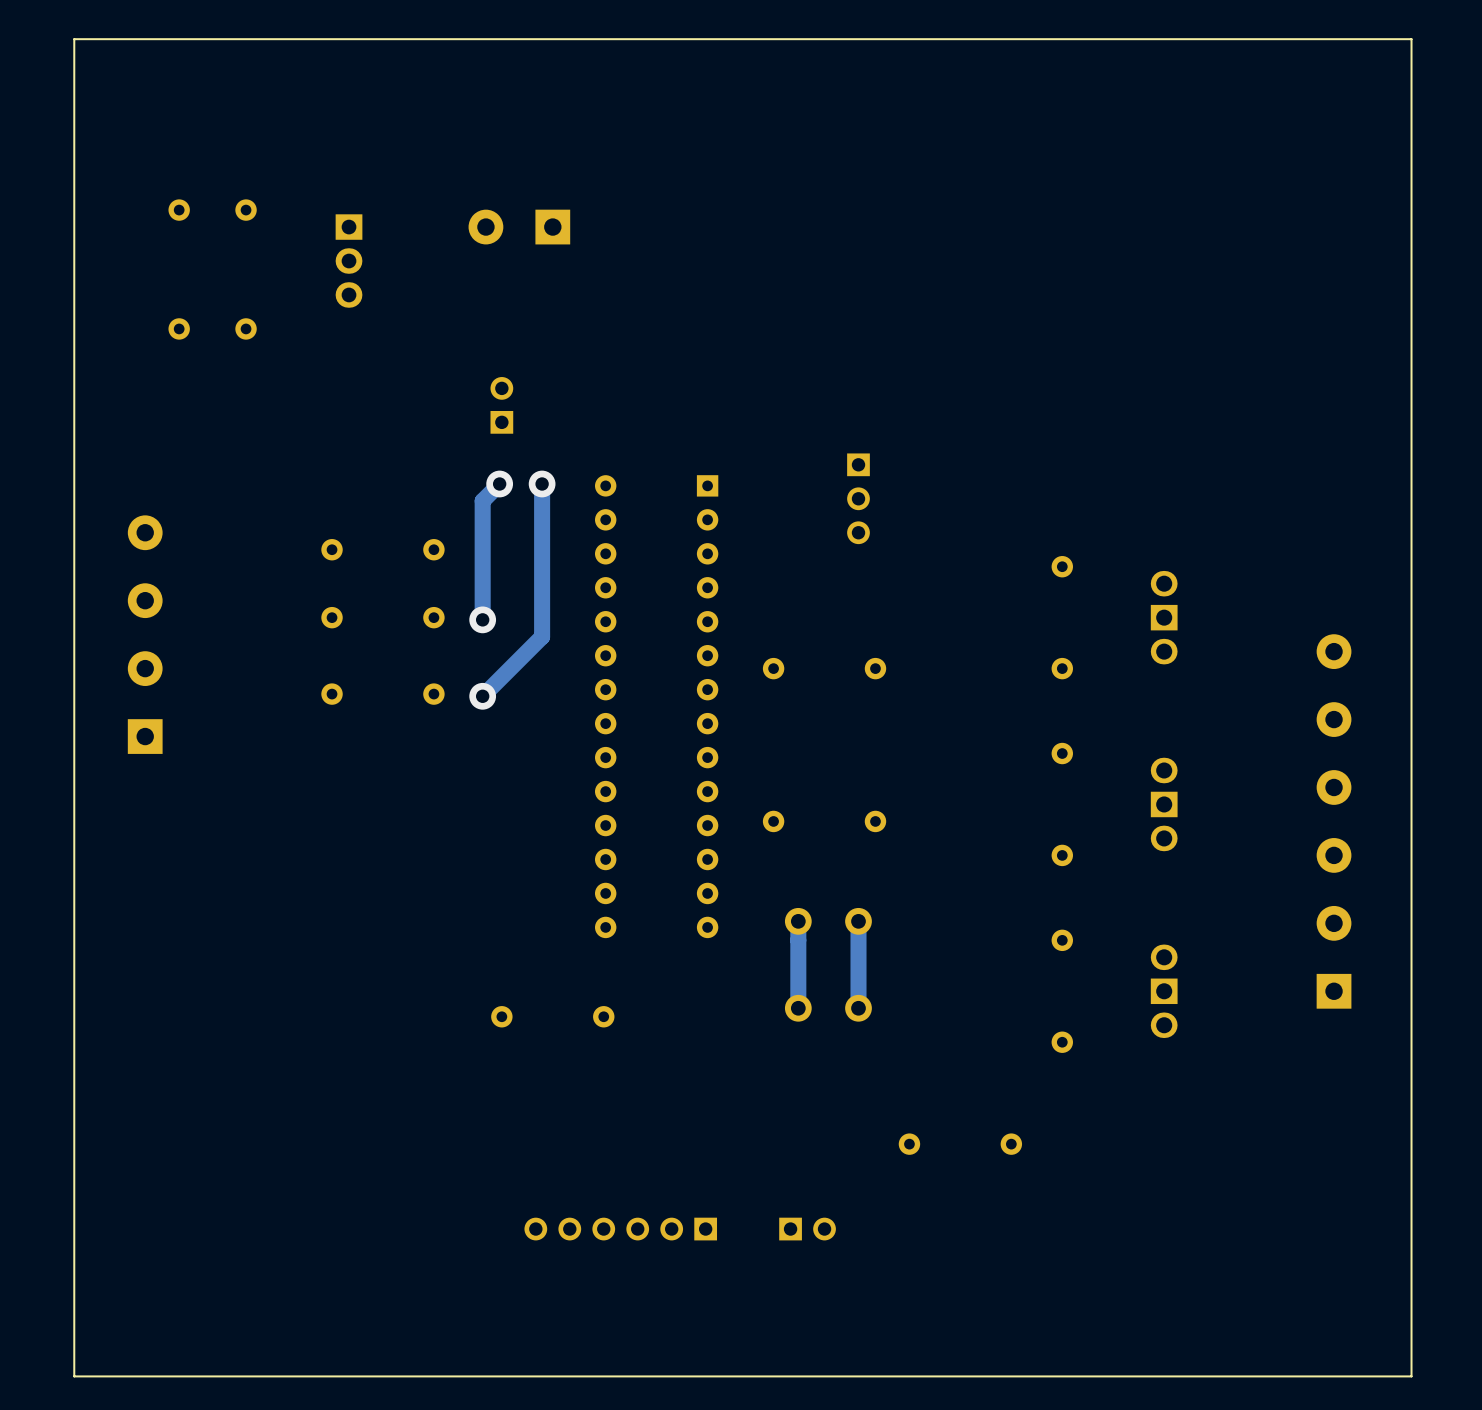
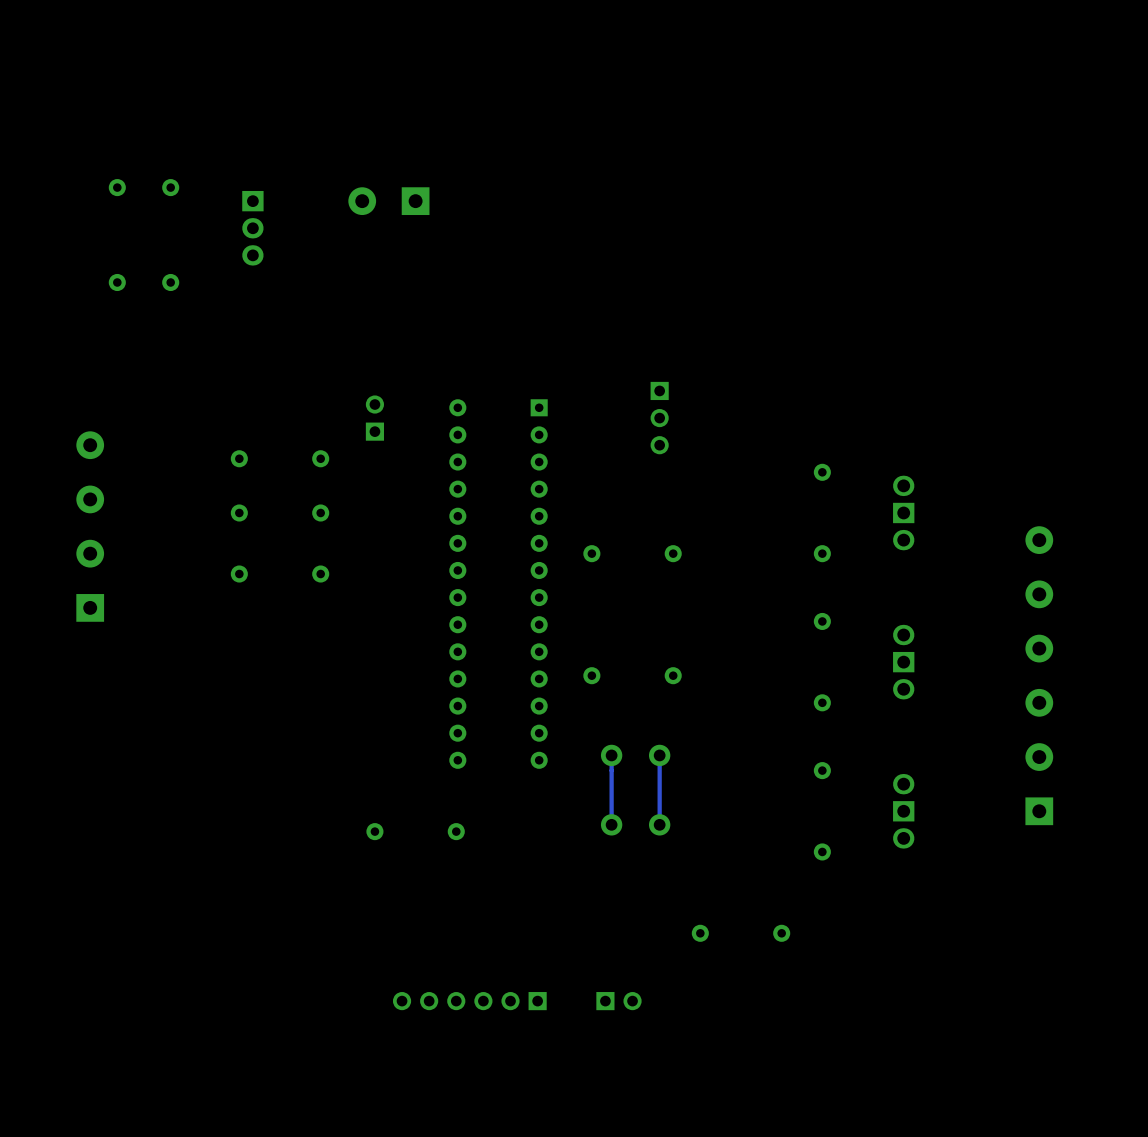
line: (1411, 39) (1411, 1376) (74, 1376) (74, 39) (1411, 39) -> none
part position: (501, 405) -> (374, 418)
track: (499, 484) (482, 500) (482, 619) -> none
via: (499, 484) -> none
track: (542, 484) (542, 636) (482, 696) -> none
via: (542, 484) -> none
via: (482, 619) -> none
via: (482, 696) -> none
track width: thick (798, 921) (798, 1008) -> thin (611, 755) (611, 824)
track width: thick (858, 921) (858, 1008) -> thin (659, 755) (659, 824)

